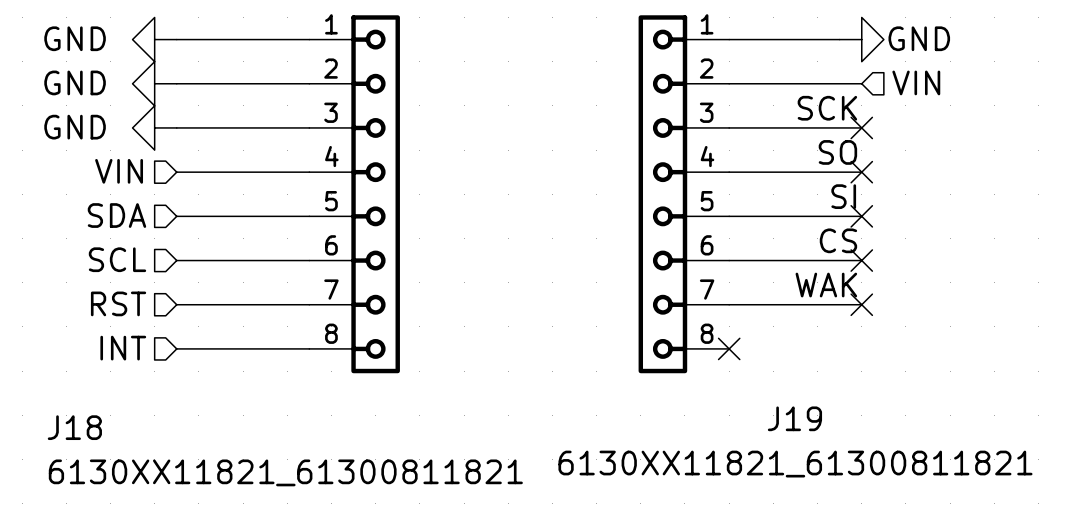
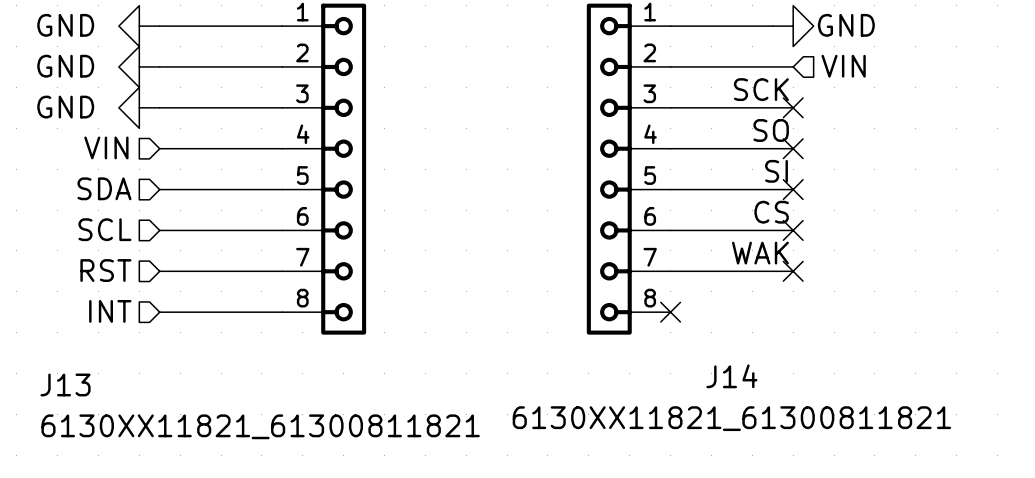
J19 name: J19 (794, 418) -> J14 (731, 376)
J18 name: J18 (74, 427) -> J13 (65, 384)

